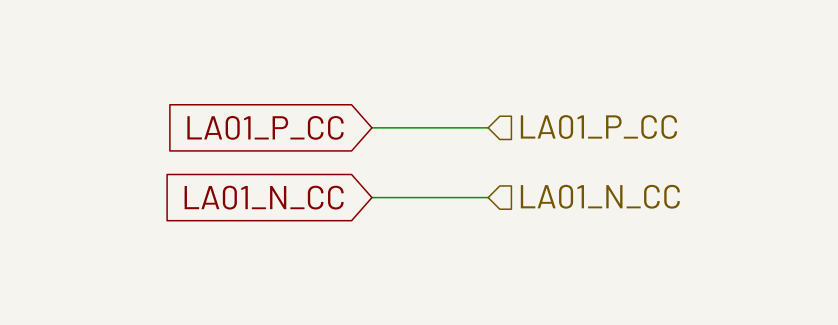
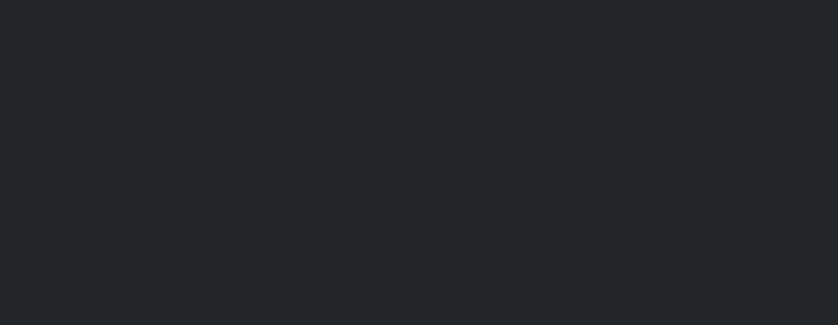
global label: LA01_P_CC (265, 127) -> none
wire: (371, 127) (488, 127) -> none
hierarchical label: LA01_P_CC (598, 127) -> none
hierarchical label: LA01_N_CC (600, 196) -> none
global label: LA01_N_CC (264, 197) -> none
wire: (371, 197) (488, 197) -> none

